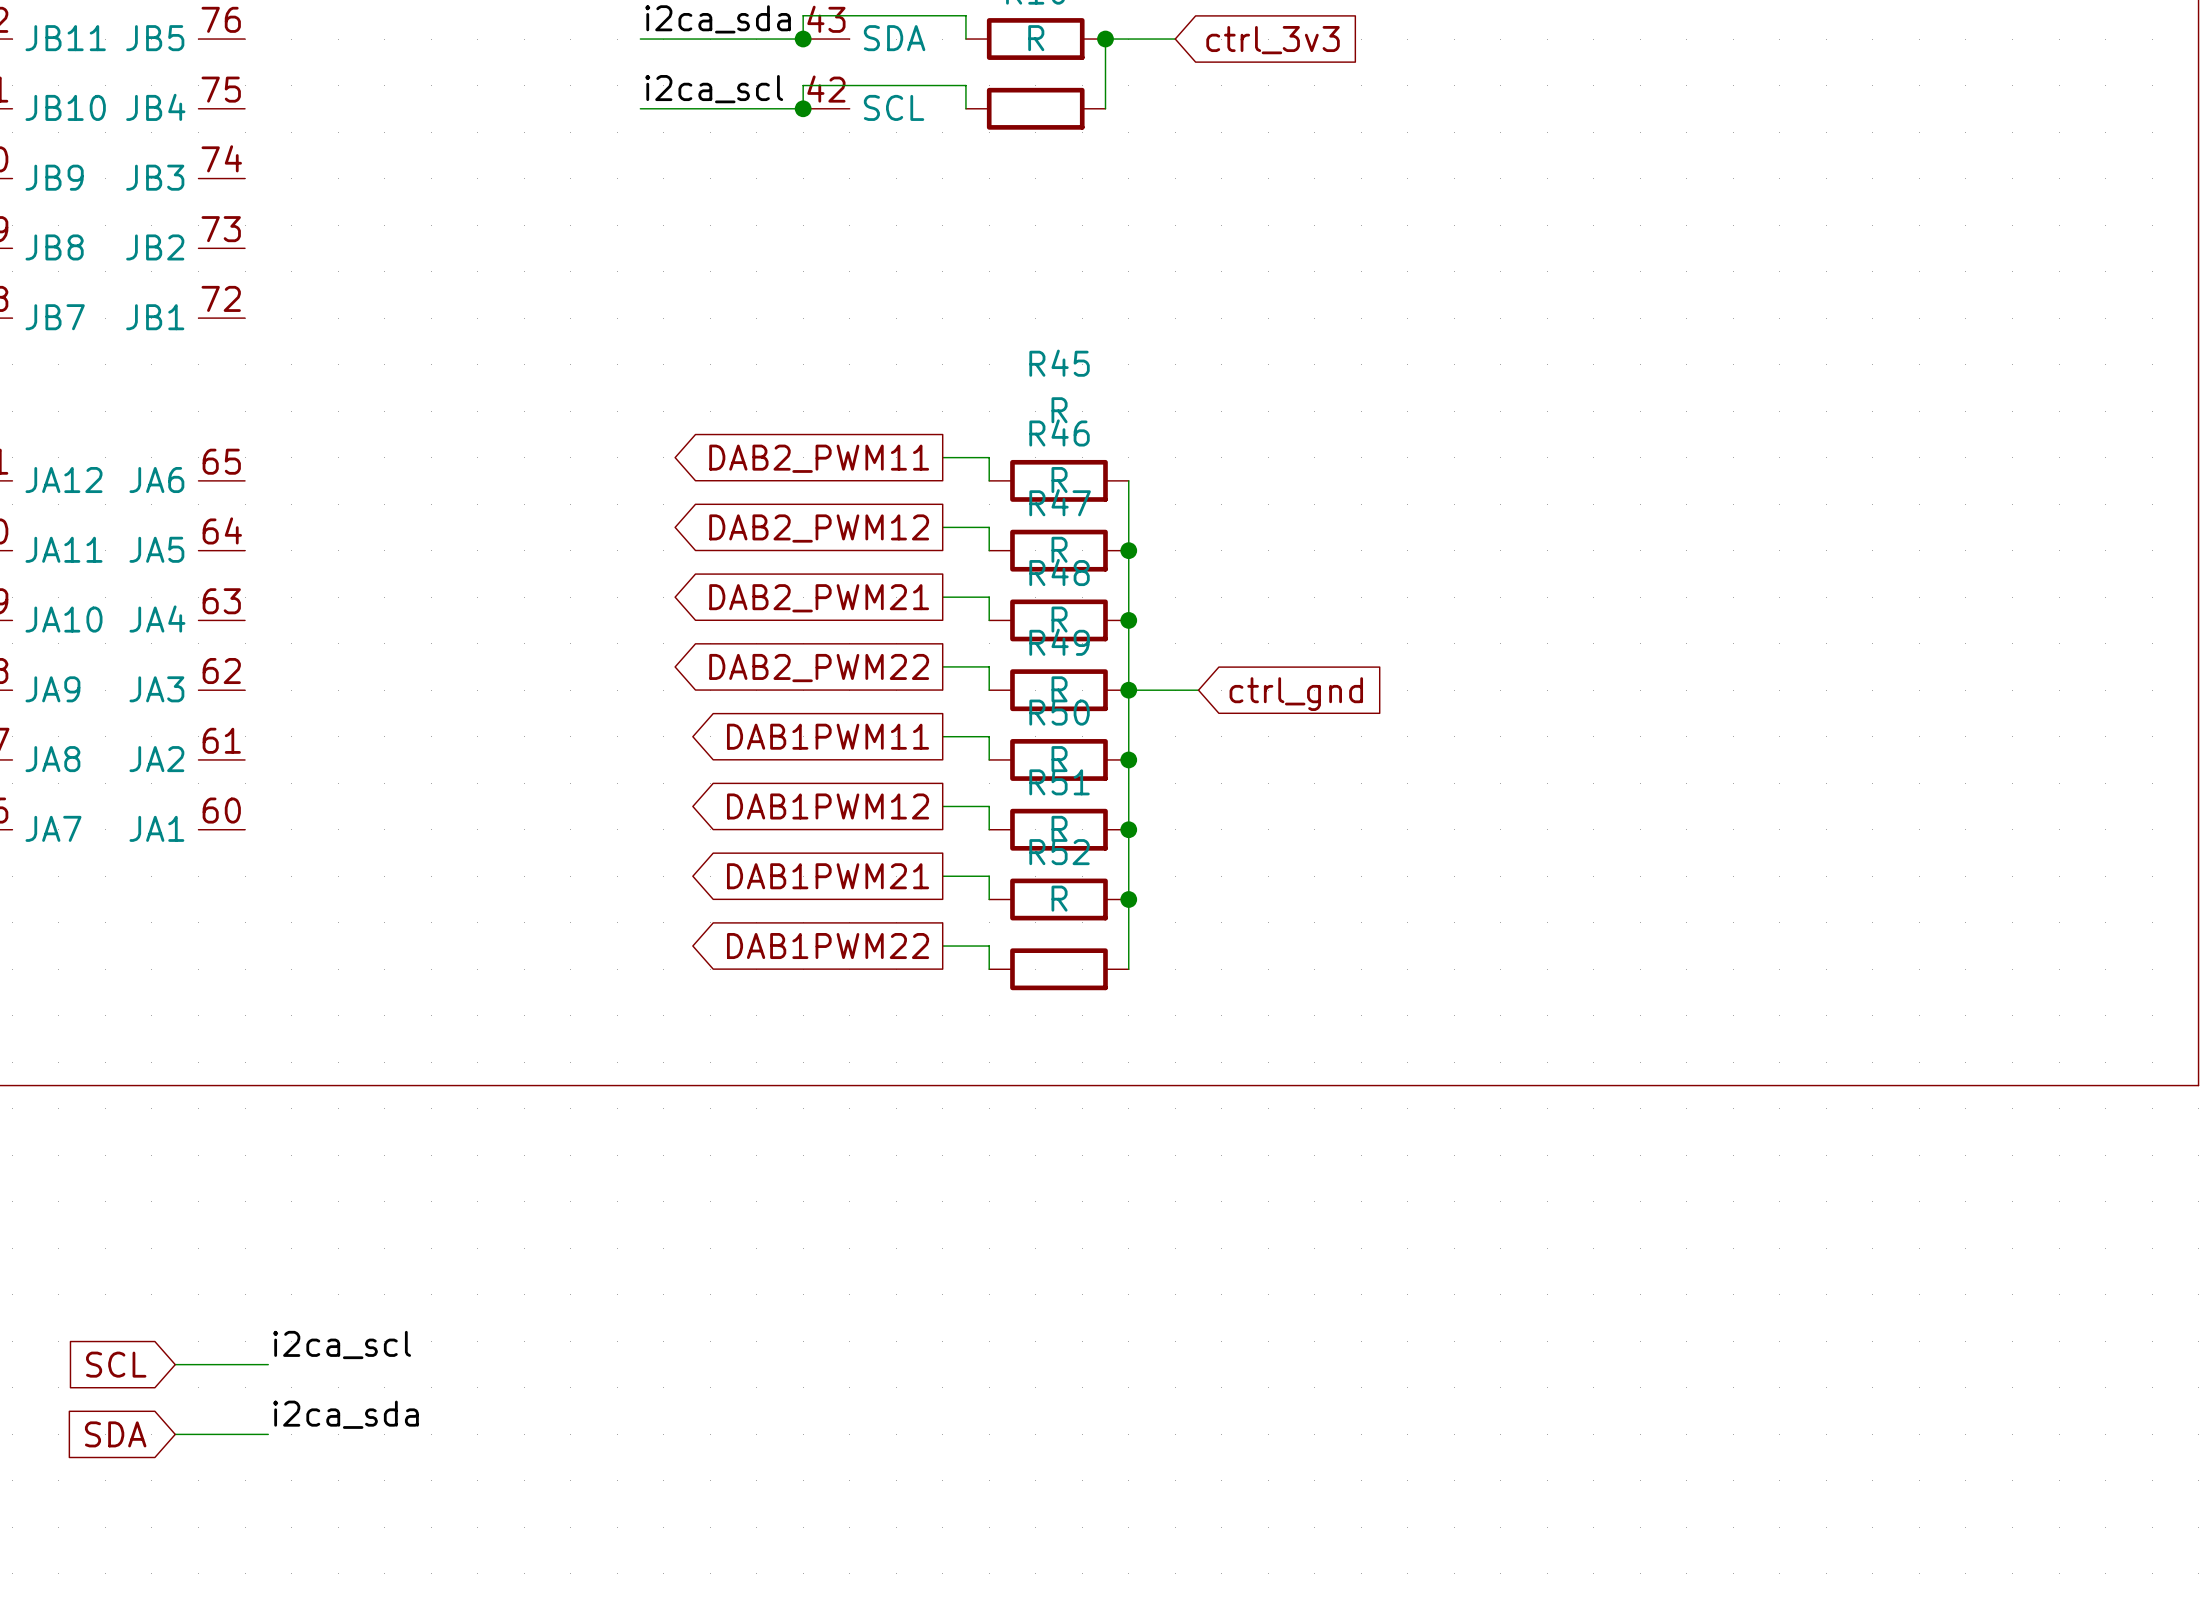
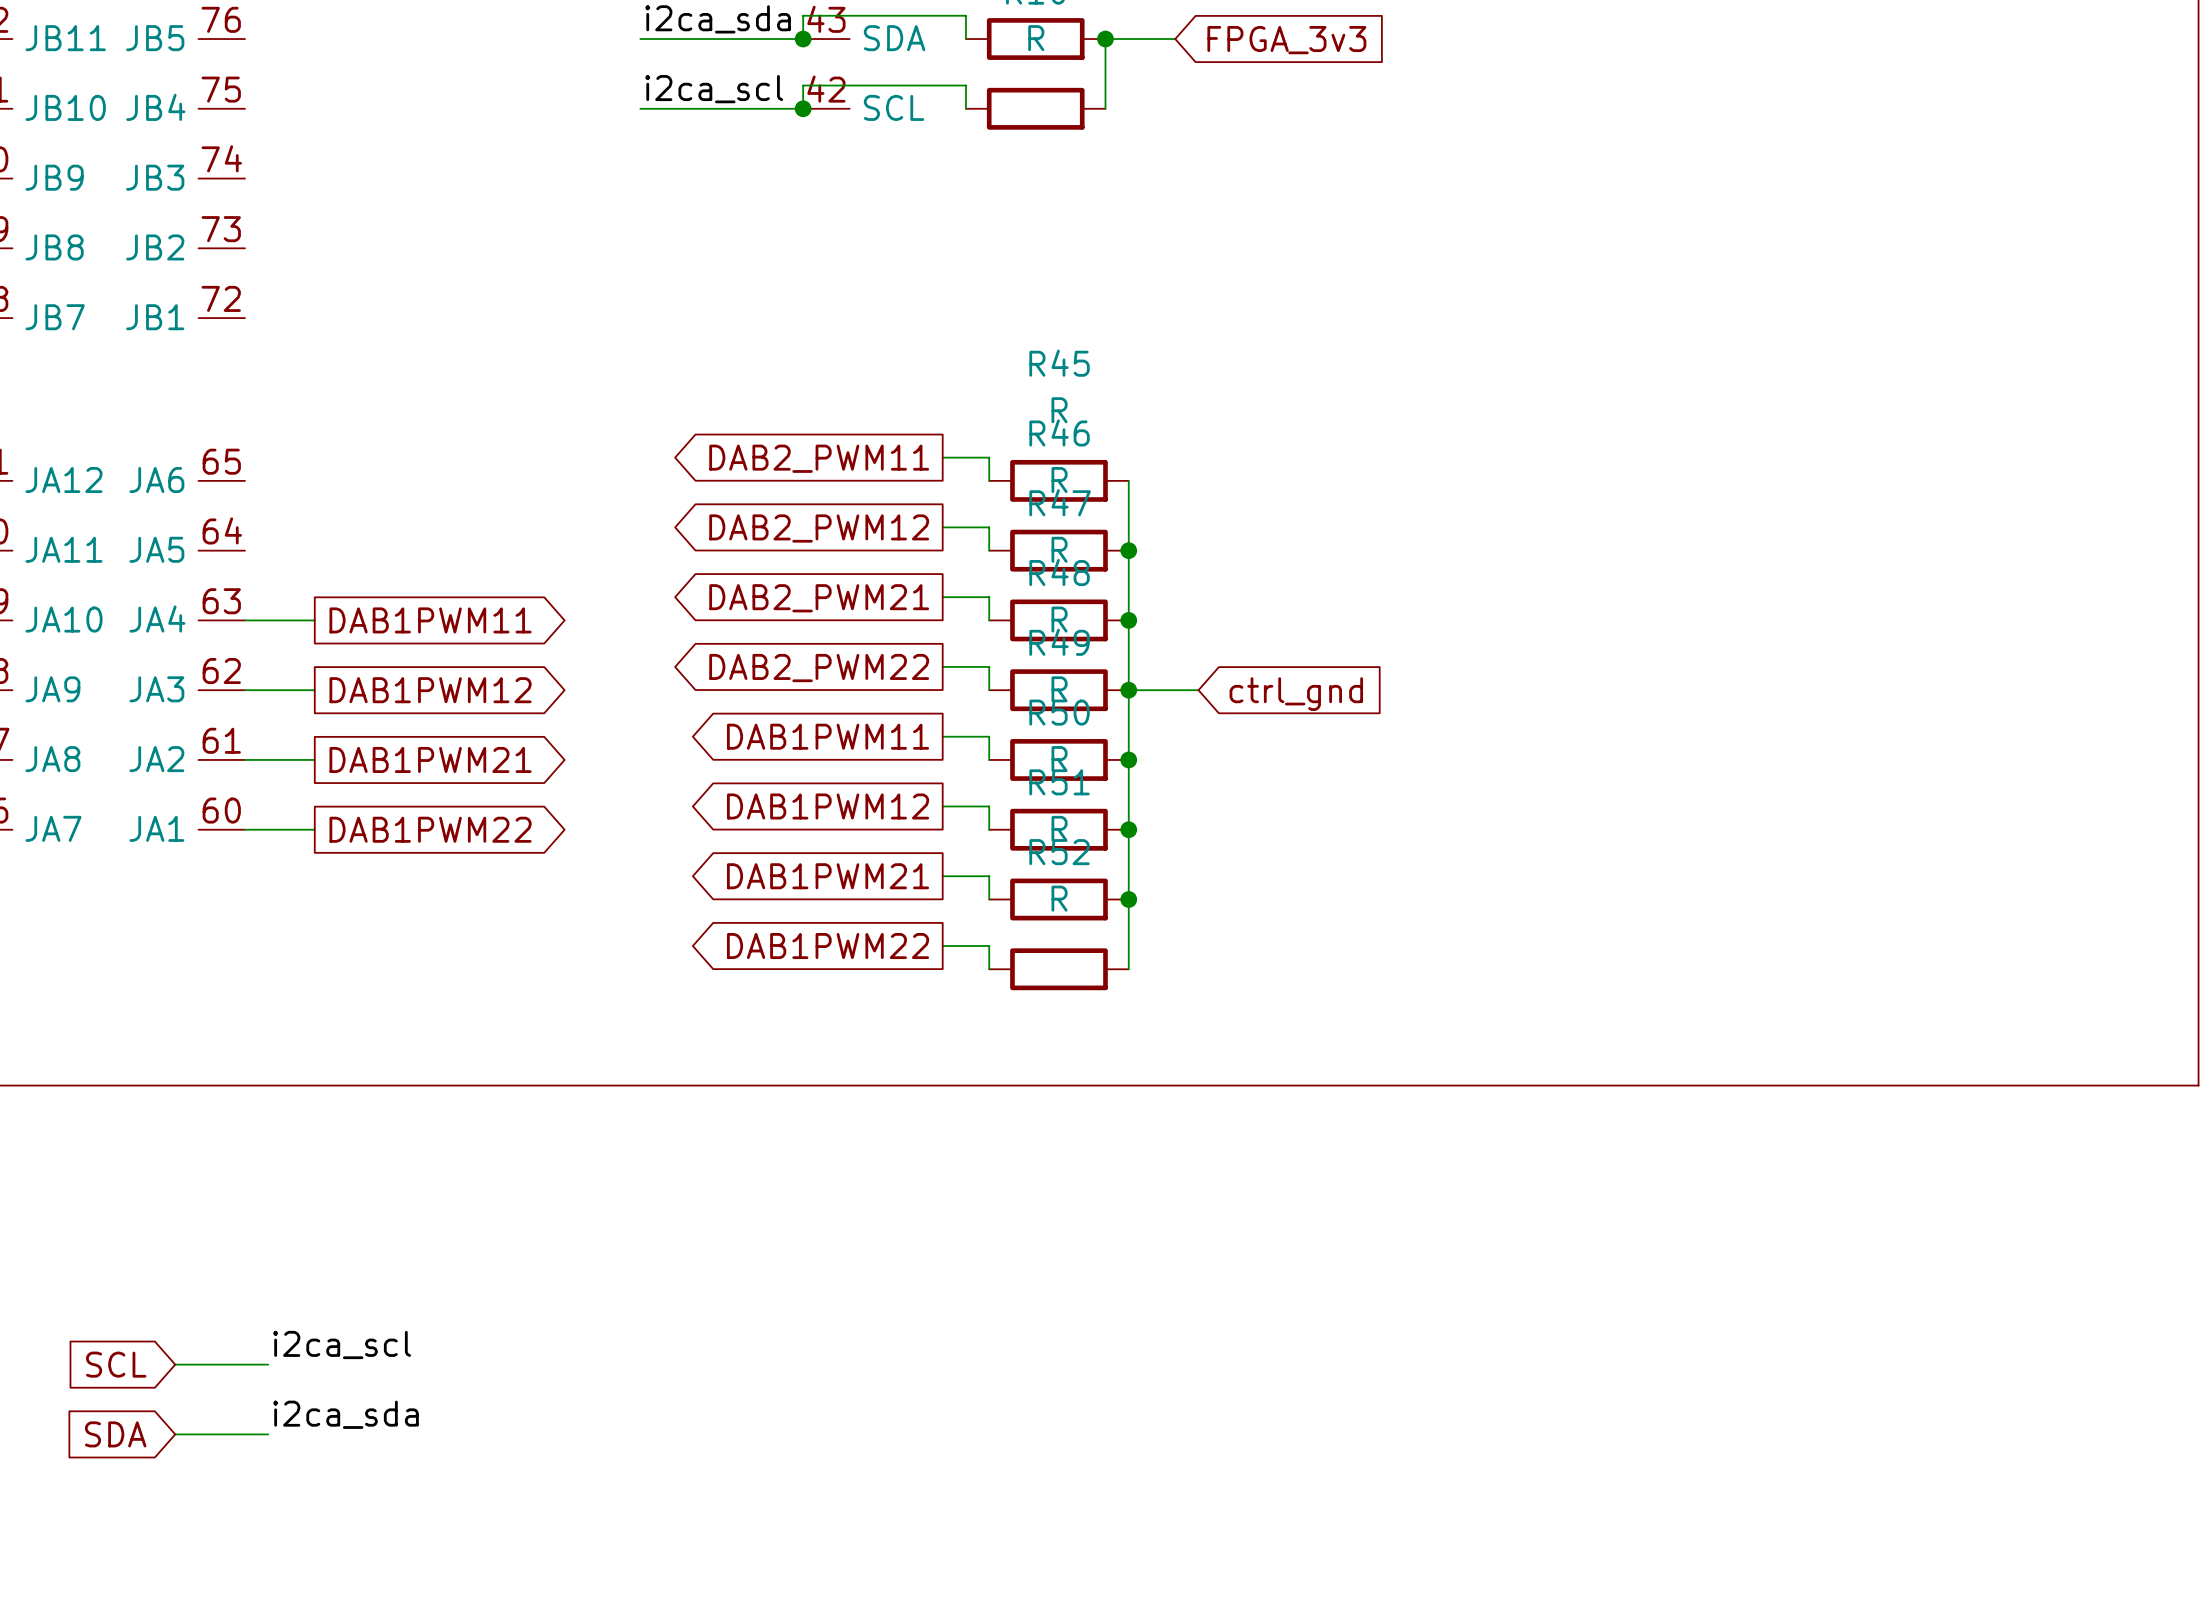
global label: ctrl_3v3 (1273, 40) -> FPGA_3v3 (1286, 40)
wire: none -> (245, 620) (314, 620)
global label: none -> DAB1PWM11 (430, 620)
wire: none -> (245, 690) (314, 690)
global label: none -> DAB1PWM12 (430, 690)
wire: none -> (245, 759) (314, 759)
global label: none -> DAB1PWM21 (430, 759)
wire: none -> (245, 829) (314, 829)
global label: none -> DAB1PWM22 (430, 829)

